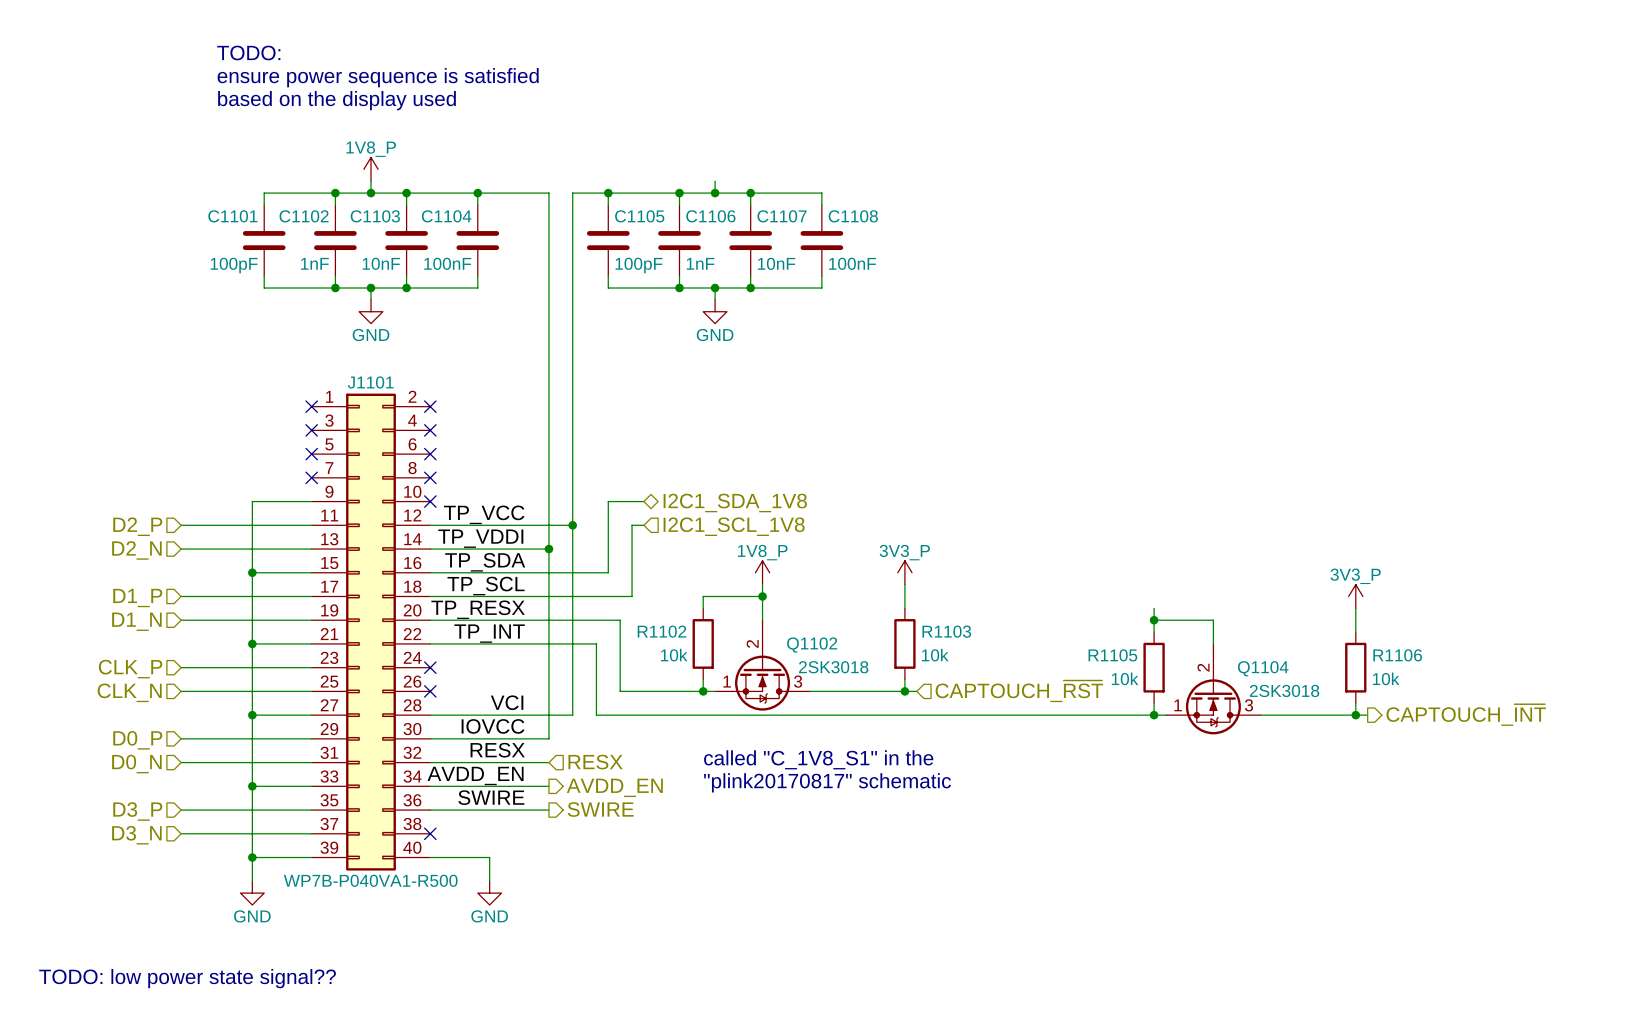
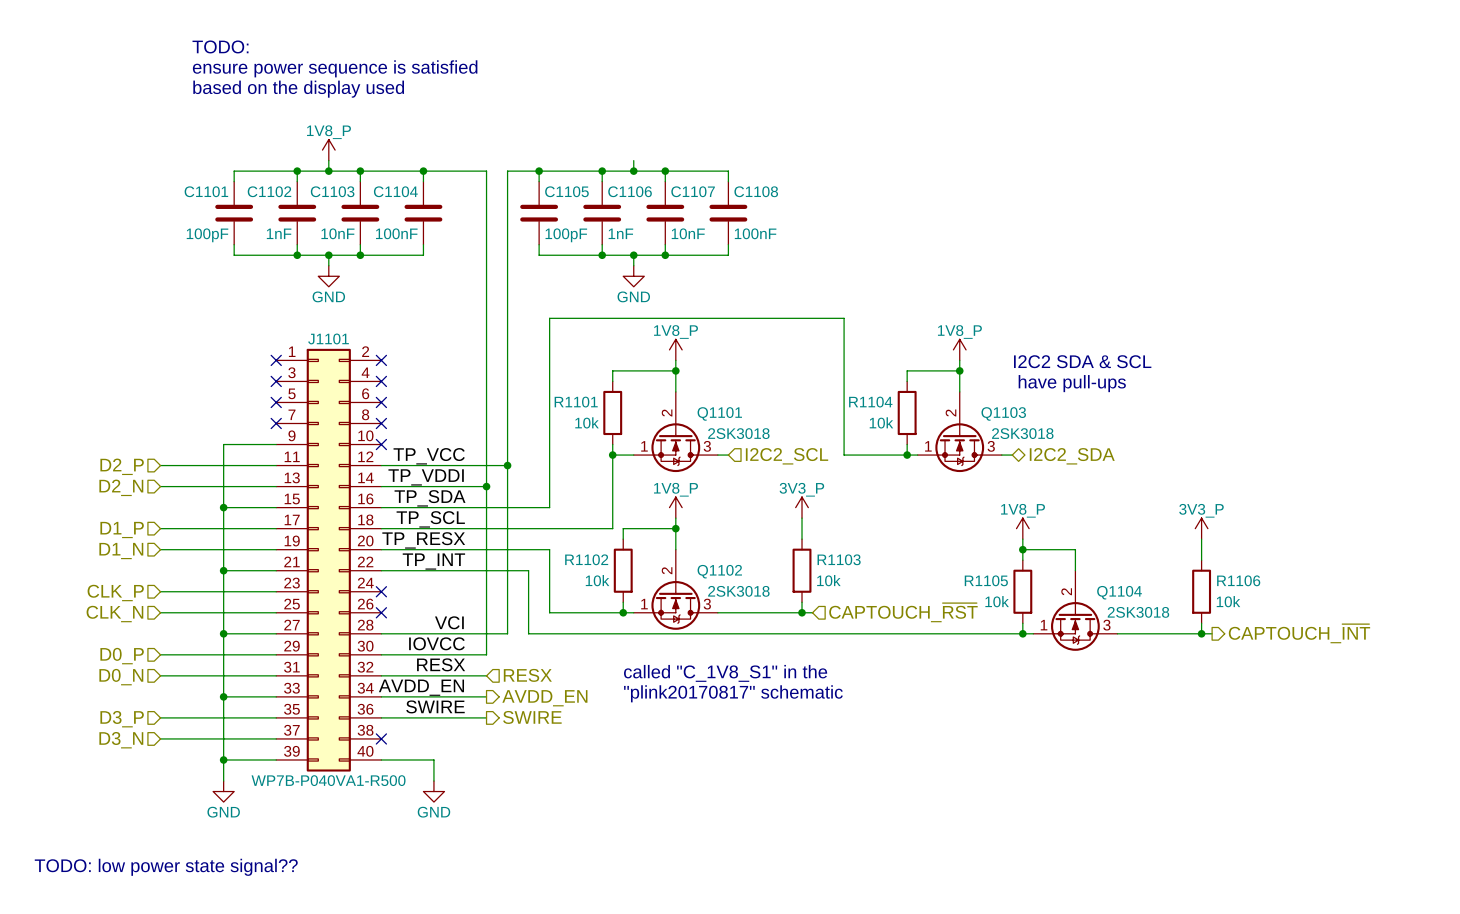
power symbol: none -> 1V8_P (675, 349)
power symbol: none -> 1V8_P (959, 349)
wire: none -> (675, 360) (675, 391)
wire: none -> (959, 360) (959, 391)
text: none -> I2C2 SDA & SCL (1082, 361)
wire: none -> (675, 370) (612, 370) (612, 381)
junction: none -> (675, 370)
wire: none -> (959, 370) (907, 370) (907, 381)
junction: none -> (959, 370)
text: none -> have pull-ups (1072, 383)
R1101: none -> 10k (612, 412)
R1104: none -> 10k (907, 412)
Q1101: none -> 2SK3018 (675, 432)
Q1103: none -> 2SK3018 (959, 432)
wire: (643, 501) (608, 501) (608, 572) -> (917, 455) (844, 455) (844, 318) (549, 318) (549, 507) (539, 507)
wire: none -> (907, 444) (907, 455)
hierarchical label: I2C1_SDA_1V8 (735, 502) -> none
wire: none -> (612, 455) (633, 455)
junction: none -> (612, 455)
wire: none -> (717, 455) (728, 455)
junction: none -> (907, 455)
wire: none -> (1001, 455) (1012, 455)
hierarchical label: none -> I2C2_SCL (787, 456)
hierarchical label: none -> I2C2_SDA (1072, 456)
wire: (643, 525) (632, 525) (632, 596) -> (612, 444) (612, 528) (560, 528)
hierarchical label: I2C1_SCL_1V8 (734, 526) -> none
power symbol: none -> 1V8_P (1022, 528)

